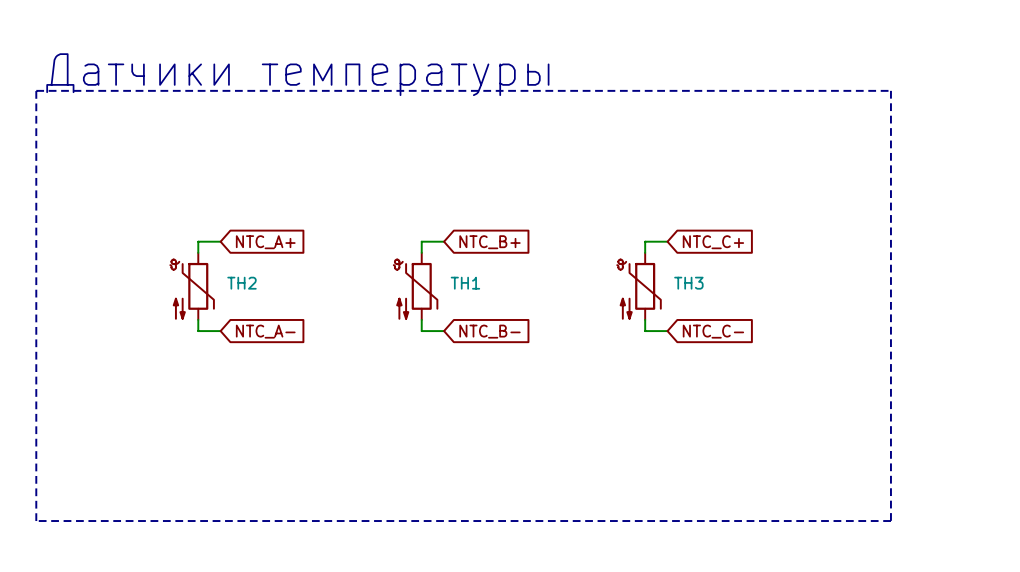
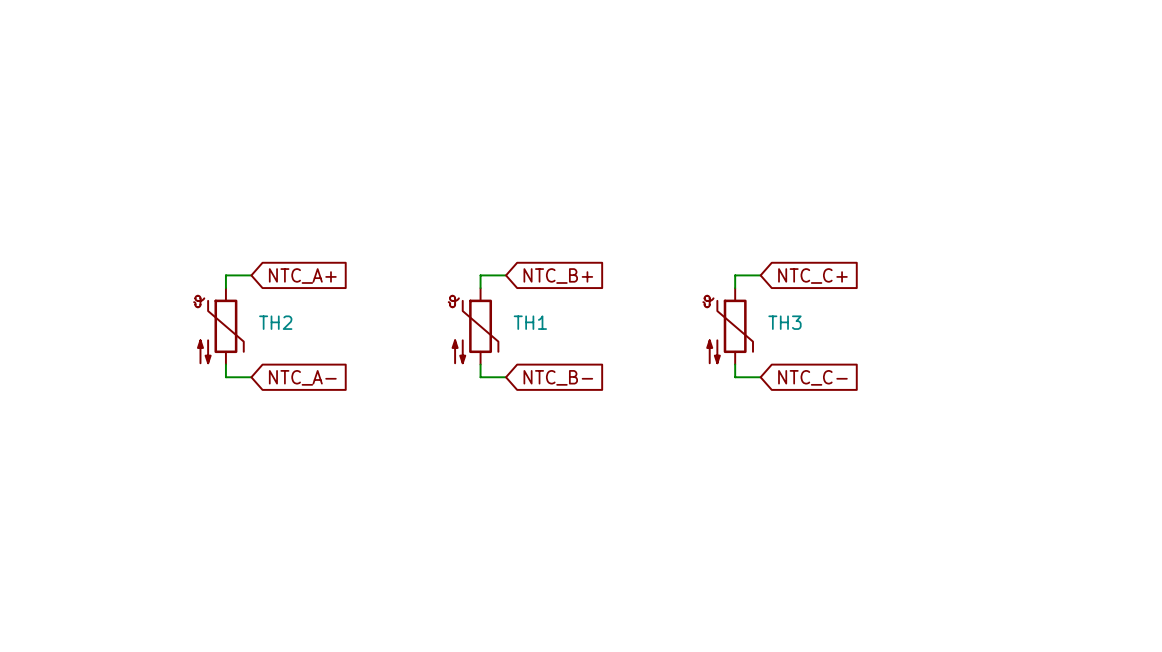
text: Датчики температуры (297, 74) -> none
line: (36, 90) (890, 90) (890, 521) (36, 521) (36, 90) -> none

